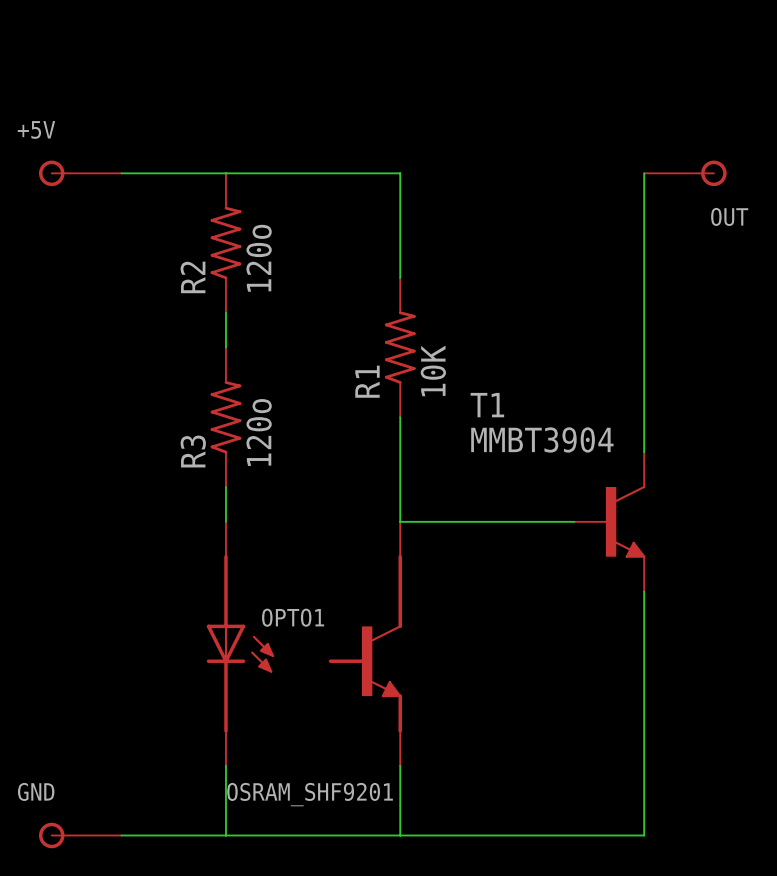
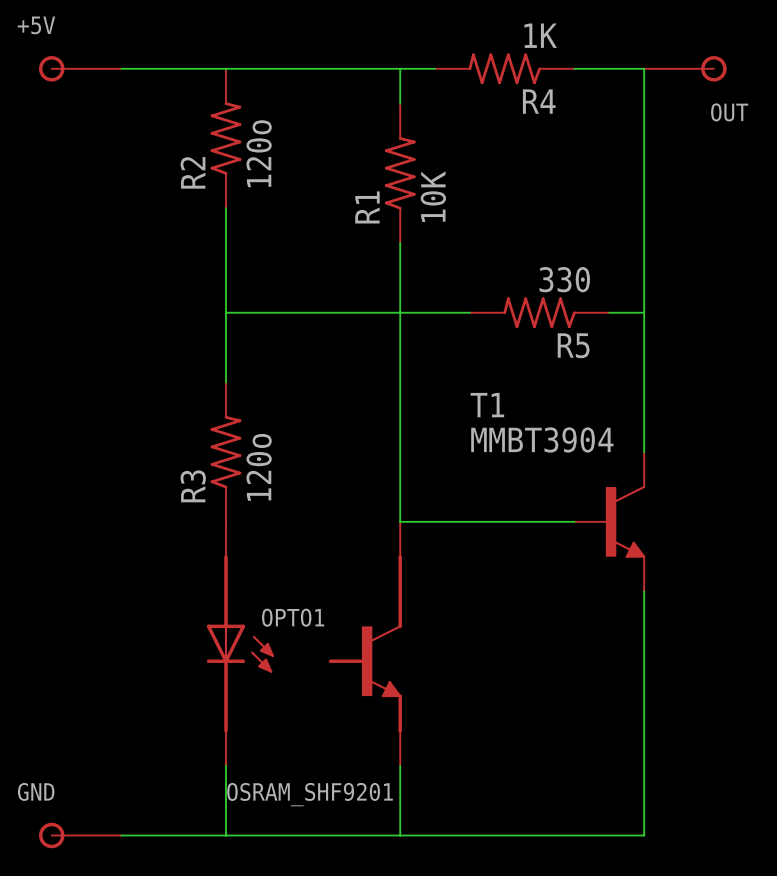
wire: none -> (121, 68) (435, 68)
wire: none -> (400, 68) (400, 103)
R4: none -> 1K (504, 68)
wire: none -> (574, 68) (644, 68) (644, 173)
+5V position: (80, 173) -> (80, 68)
wire: (121, 173) (400, 173) (400, 243) -> none
OUT position: (685, 173) -> (685, 68)
wire: none -> (225, 208) (225, 312) (469, 312)
R2 position: (225, 243) -> (225, 138)
R5: none -> 330 (539, 312)
wire: none -> (609, 312) (644, 312)
R1 position: (400, 347) -> (400, 173)
R3 position: (225, 417) -> (225, 452)

